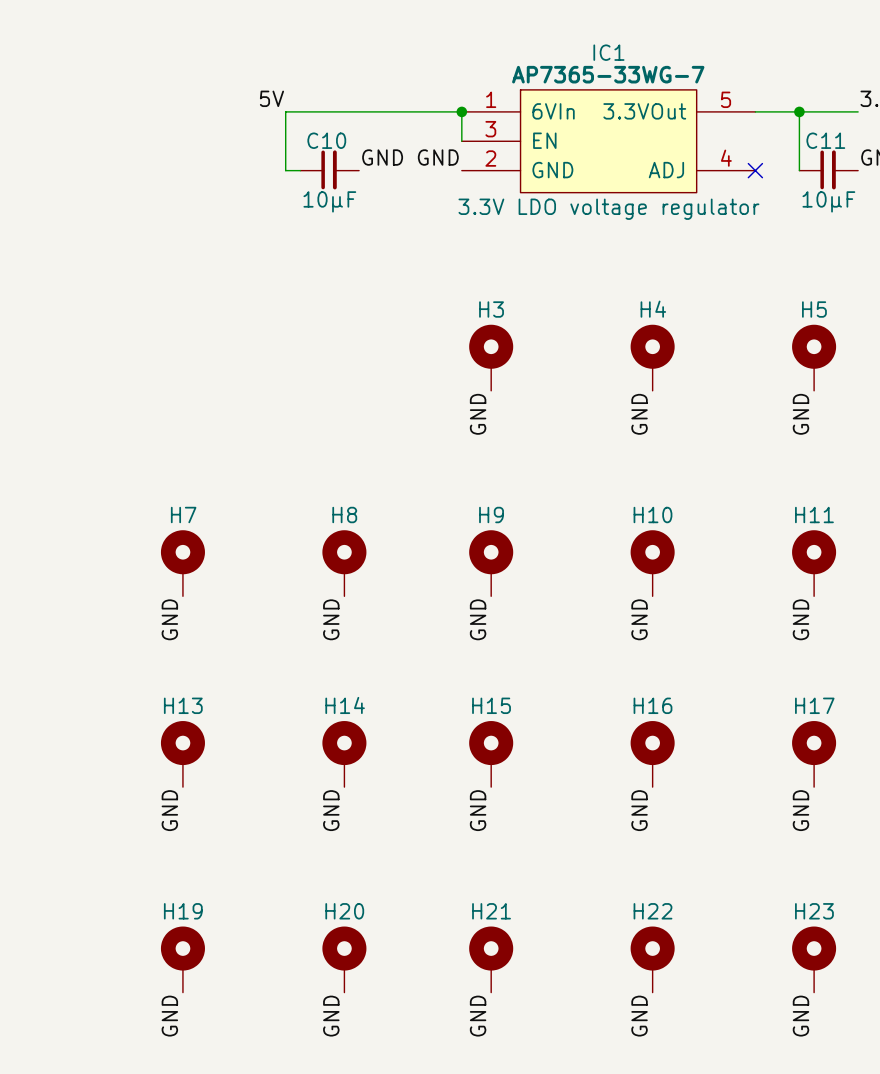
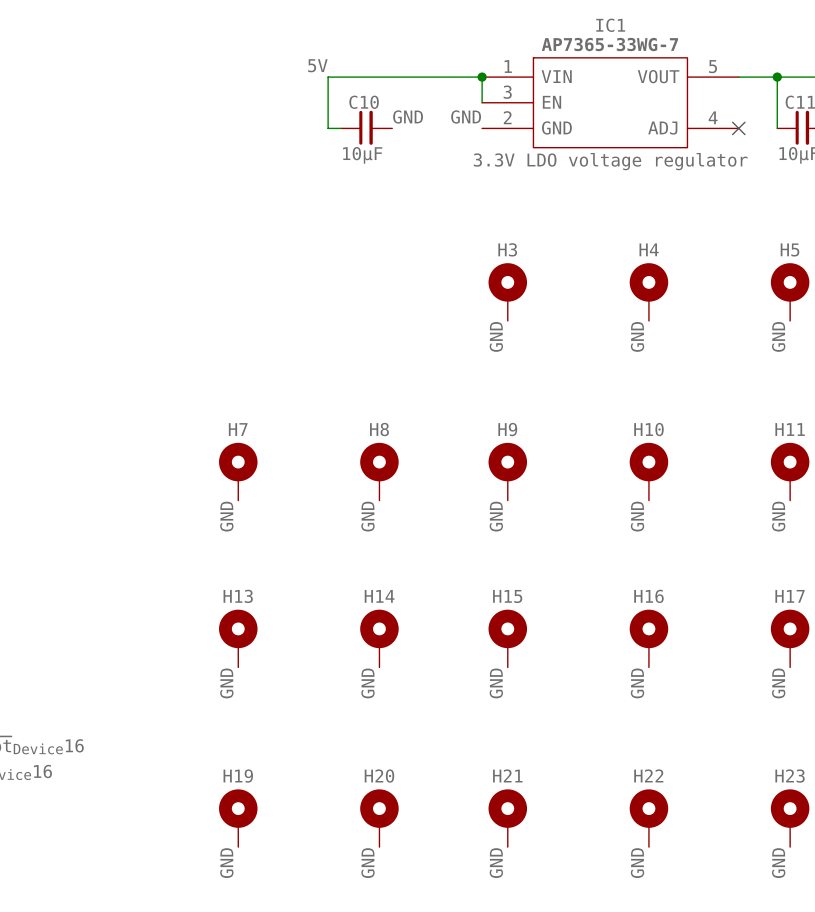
IC1 pin name: 6VIn (553, 111) -> VIN (556, 76)
IC1 pin name: 3.3VOut (644, 111) -> VOUT (658, 76)

